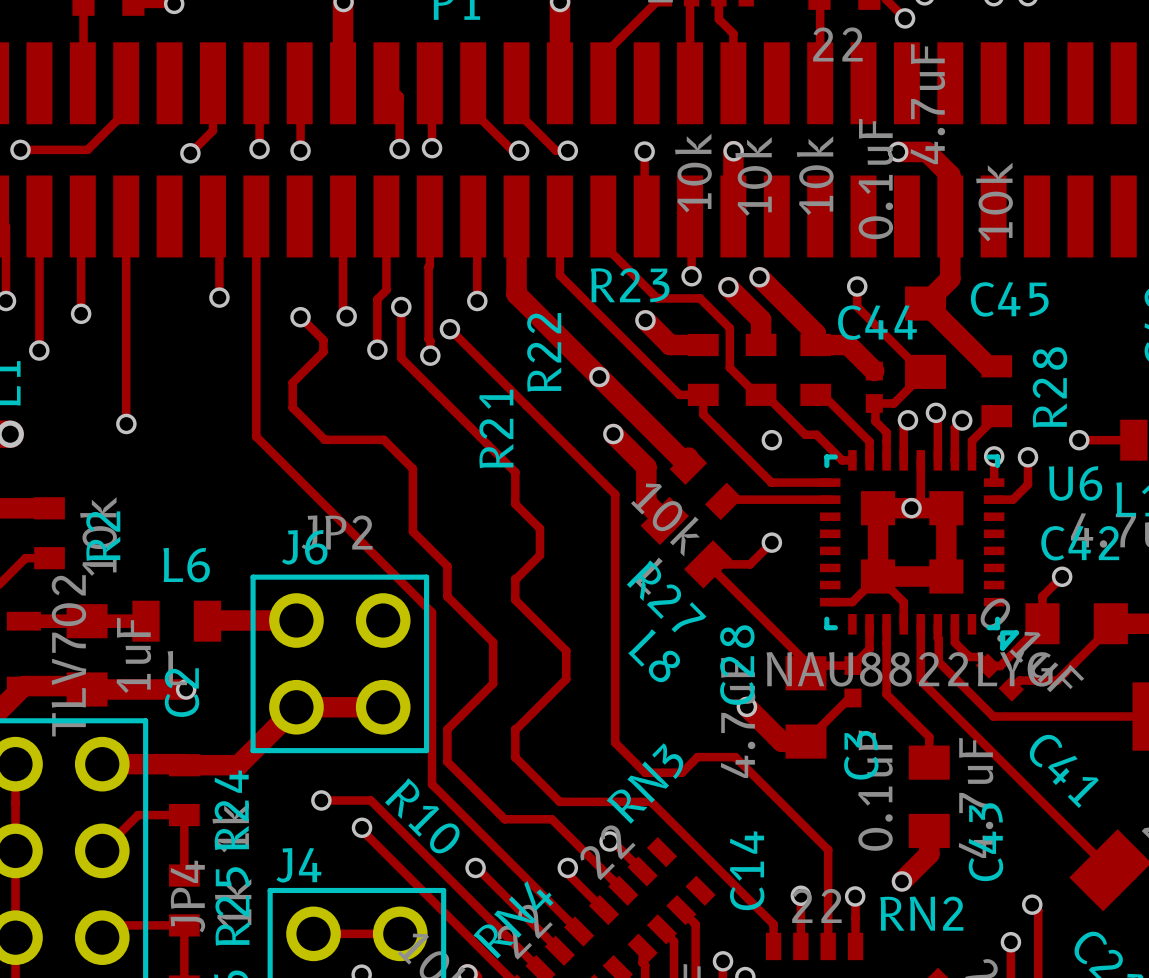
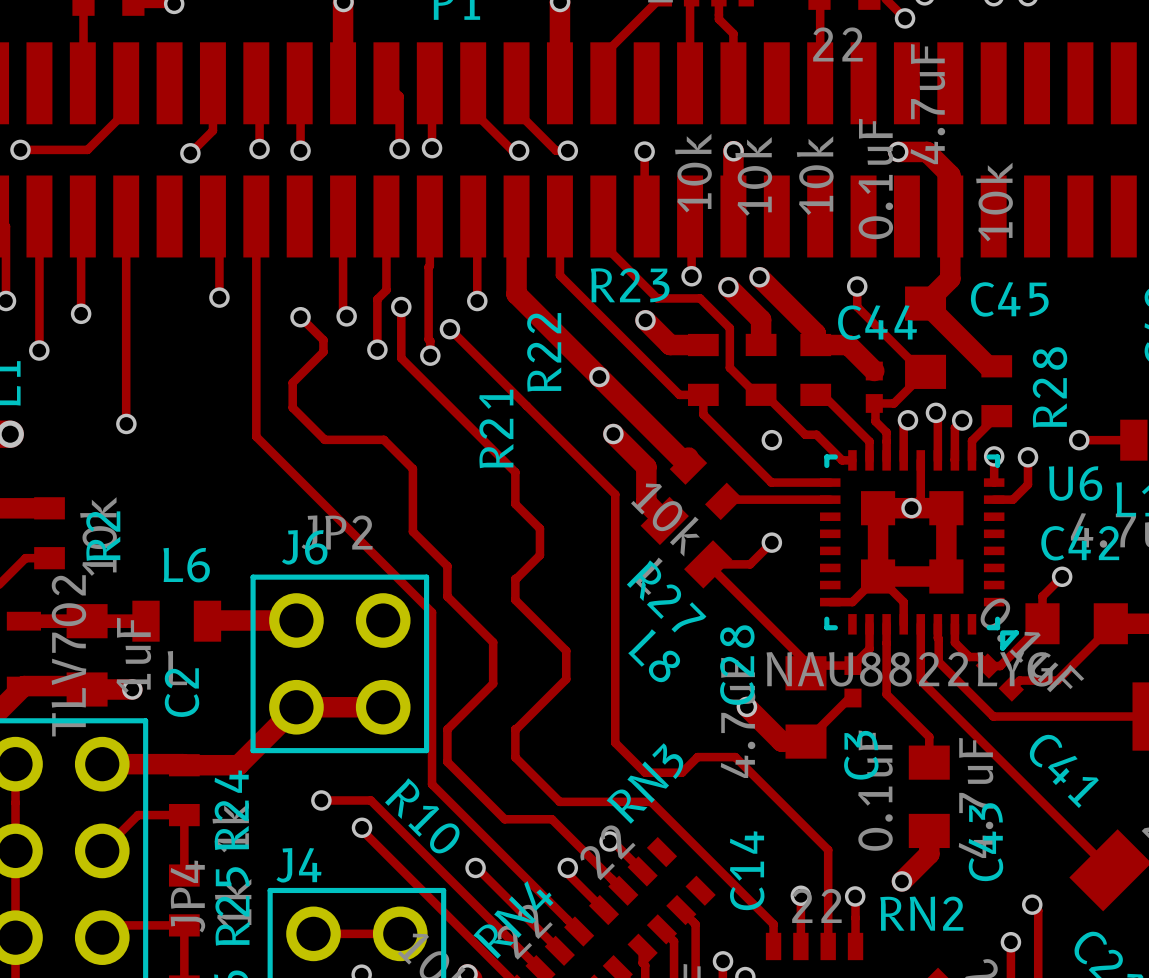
track: (132, 689) (186, 689) -> none
via position: (186, 689) -> (132, 689)

